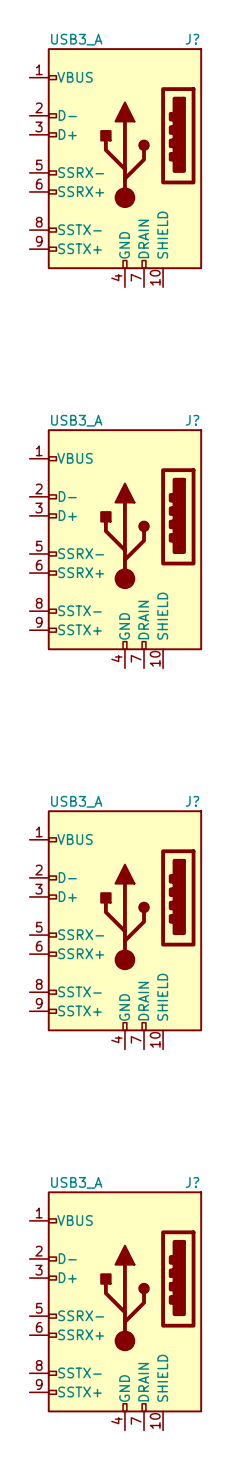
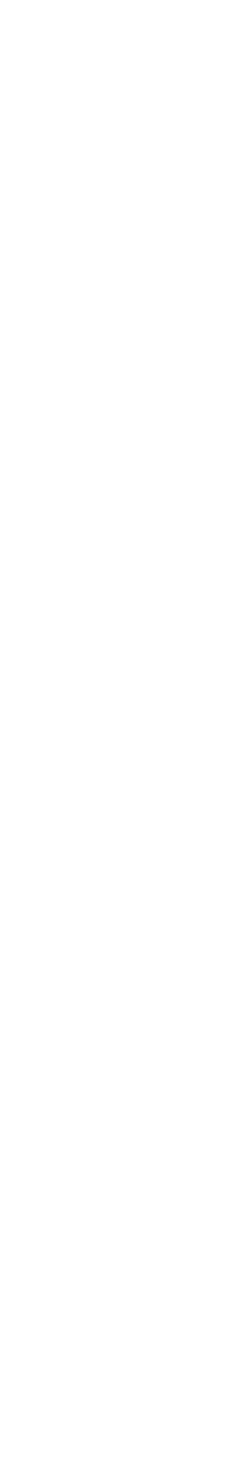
J?: USB3_A (115, 167) -> none
J?: USB3_A (115, 548) -> none
J?: USB3_A (115, 929) -> none
J?: USB3_A (115, 1310) -> none

